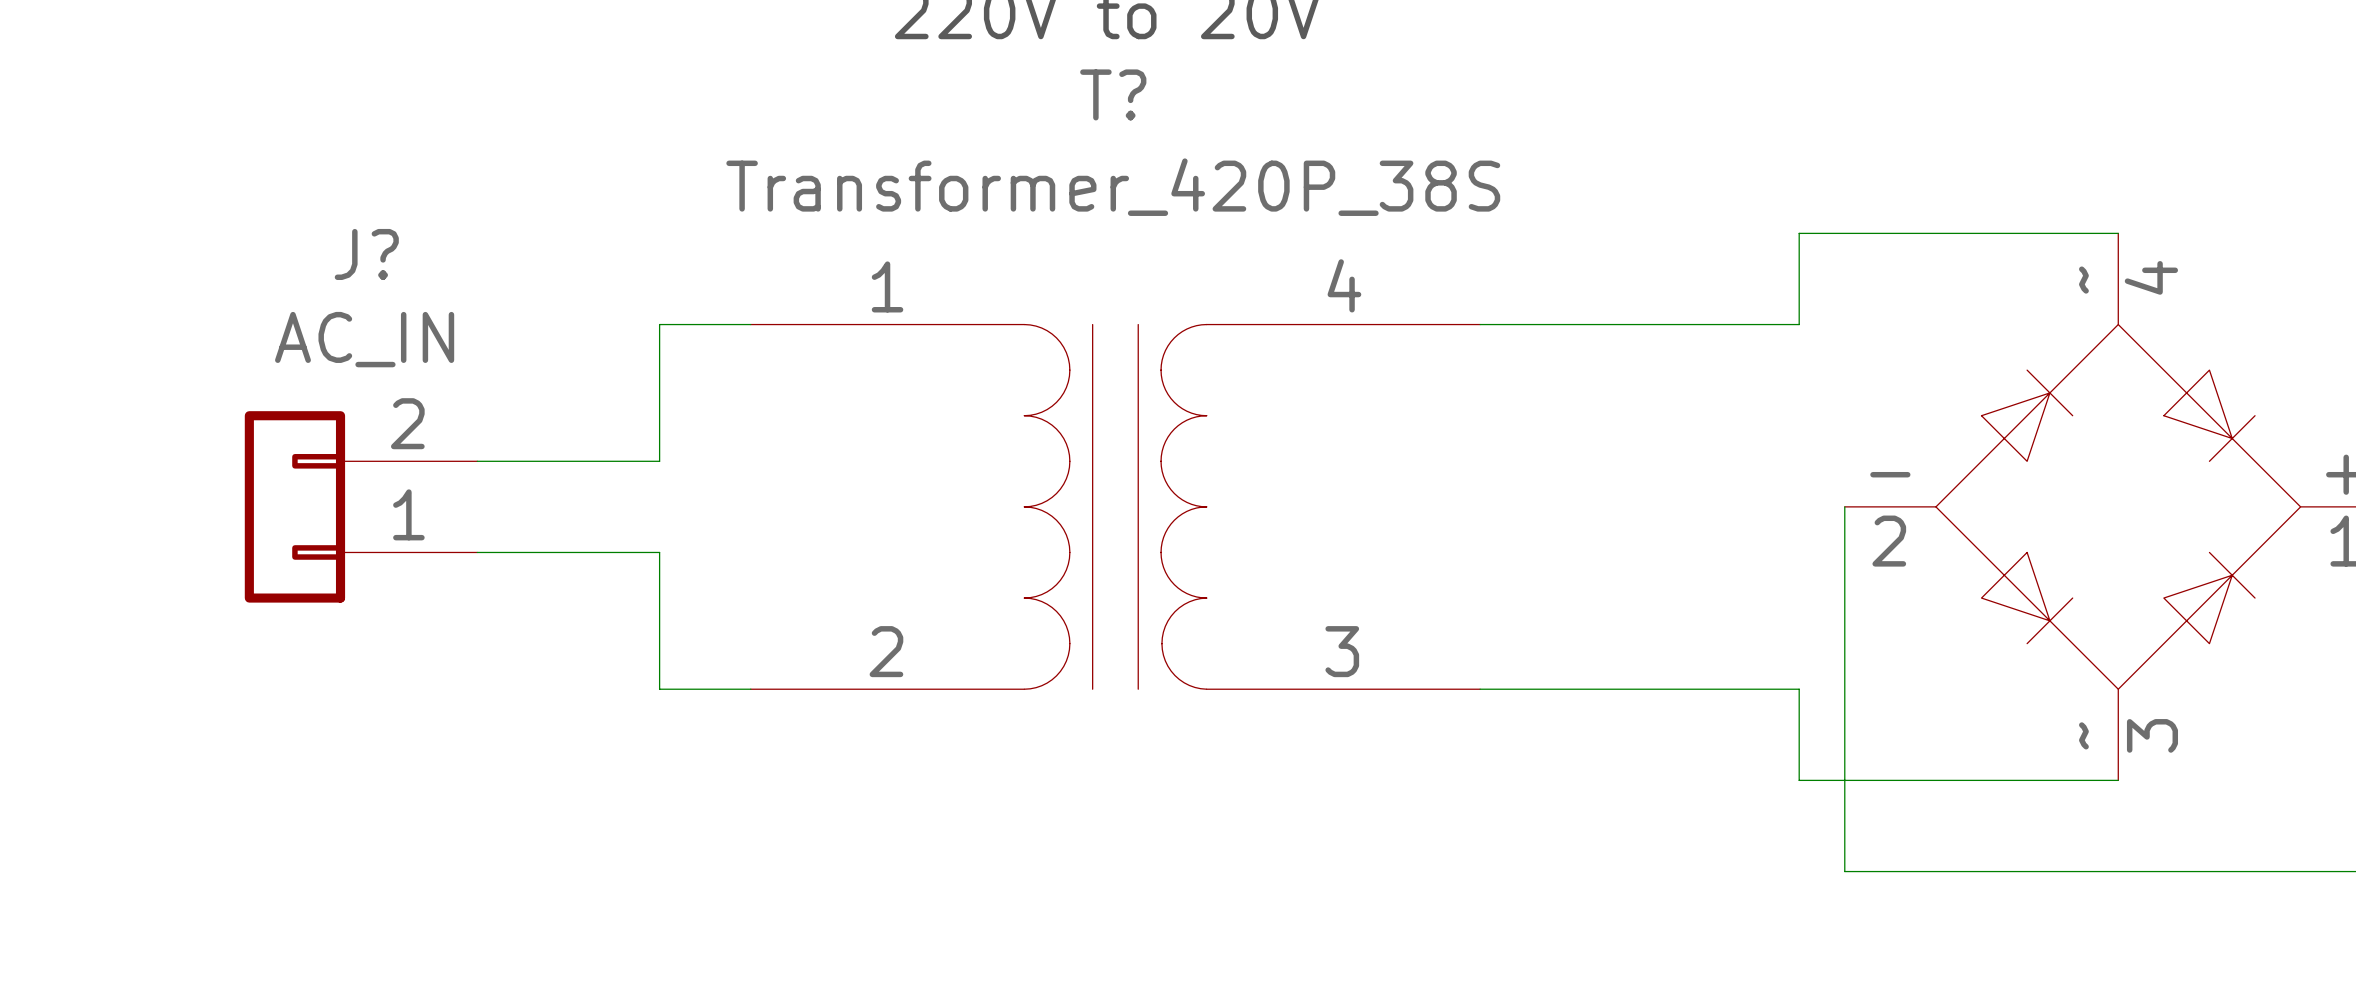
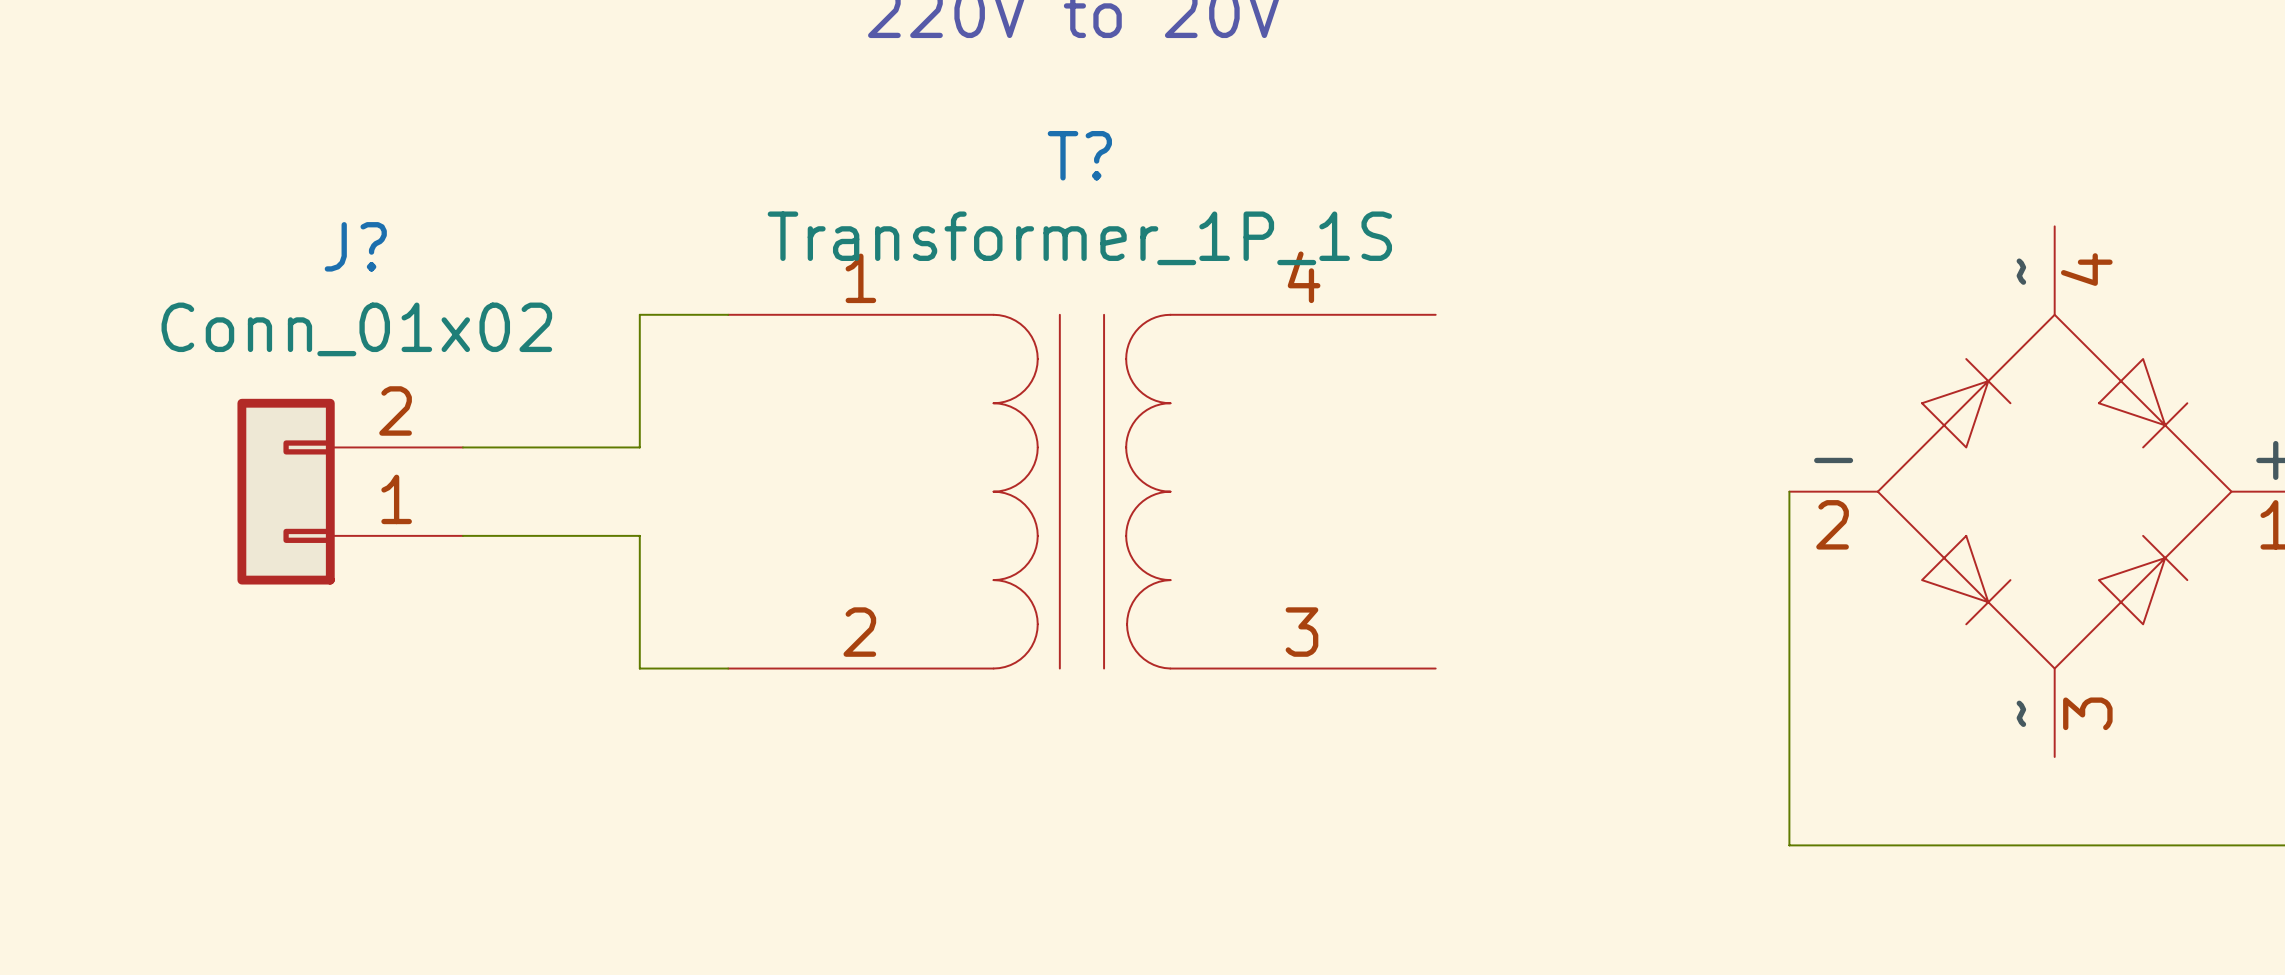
T? name position: T? (1113, 94) -> T? (1079, 155)
T? value: Transformer_420P_38S (1113, 187) -> Transformer_1P_1S (1079, 238)
wire: (2118, 233) (1799, 233) (1799, 324) (1480, 324) -> none
J? value: AC_IN (364, 339) -> Conn_01x02 (356, 329)
wire: (1480, 689) (1799, 689) (1799, 780) (2118, 780) -> none

